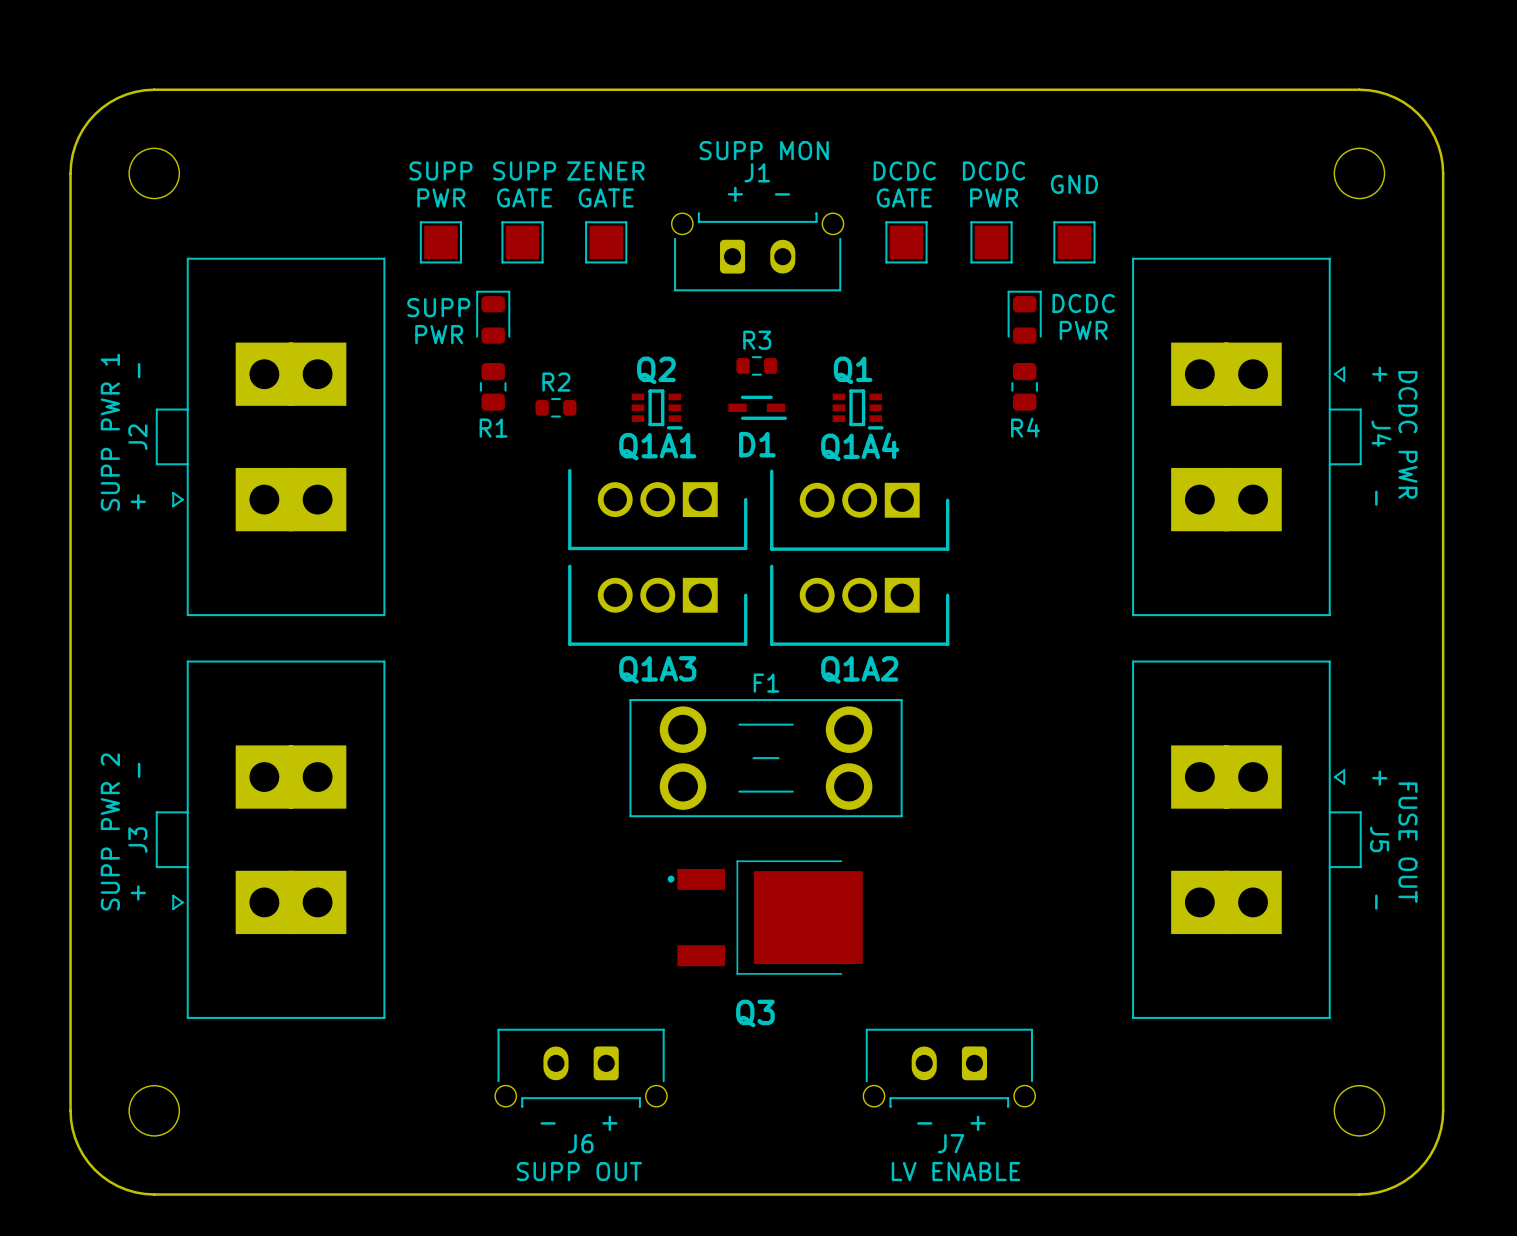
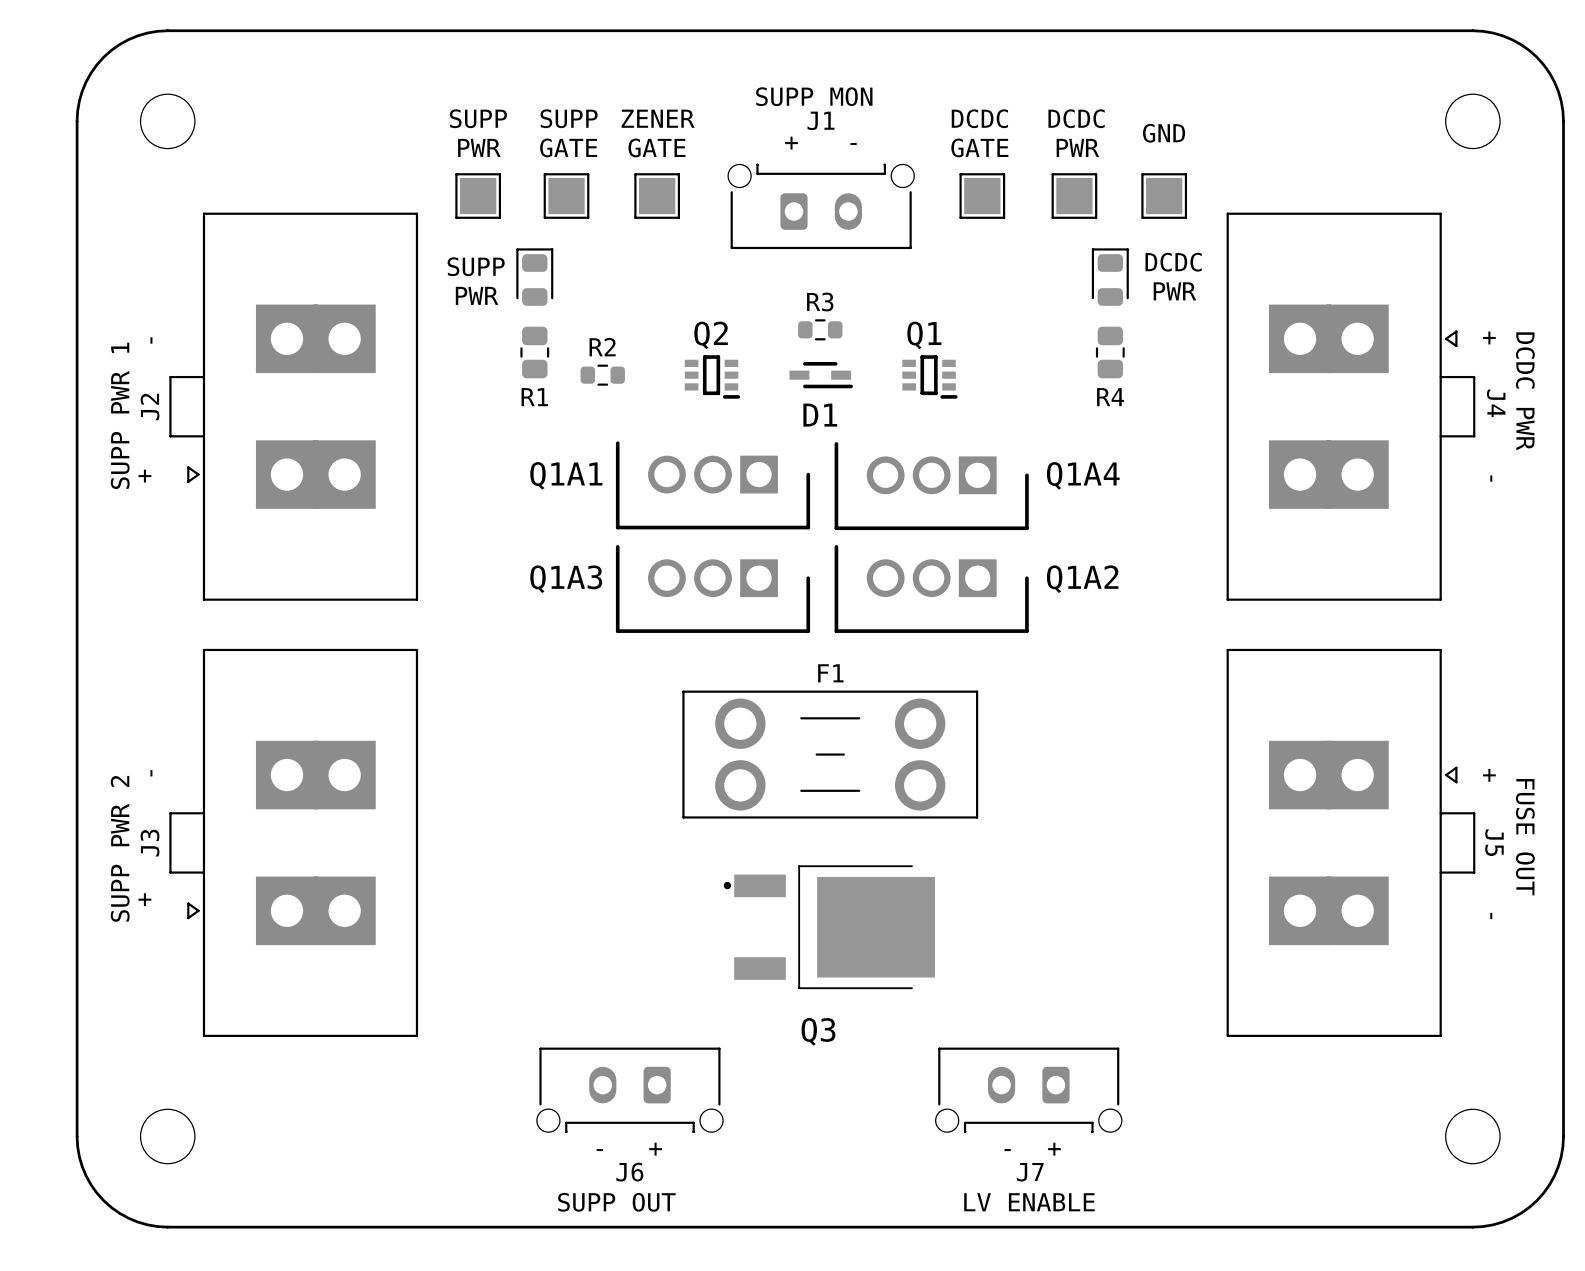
Q1A1 name position: Q1A1 (657, 446) -> Q1A1 (566, 475)
Q1A4 name position: Q1A4 (860, 446) -> Q1A4 (1083, 475)
Q1A3 name position: Q1A3 (657, 669) -> Q1A3 (566, 579)
Q1A2 name position: Q1A2 (859, 669) -> Q1A2 (1082, 579)

